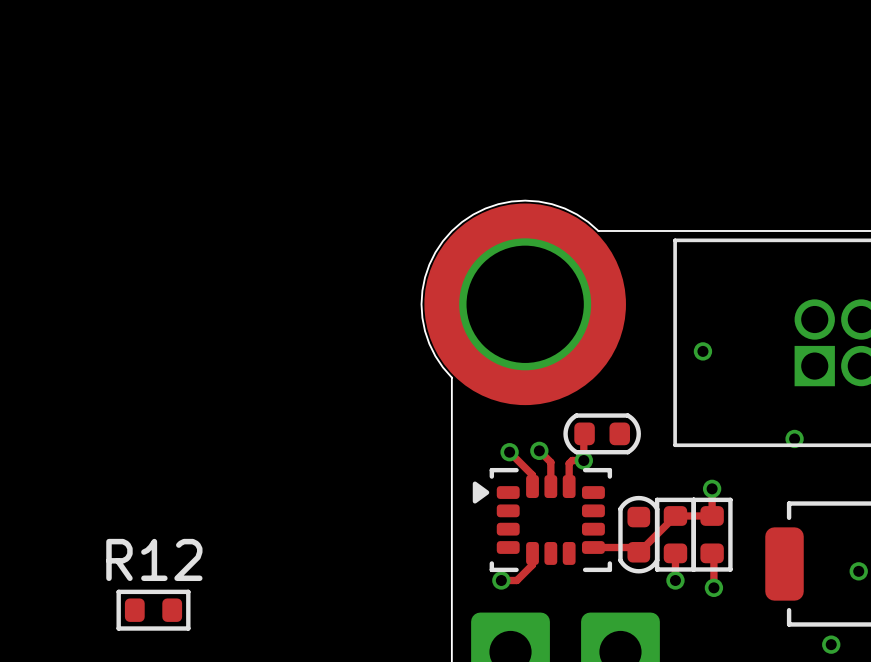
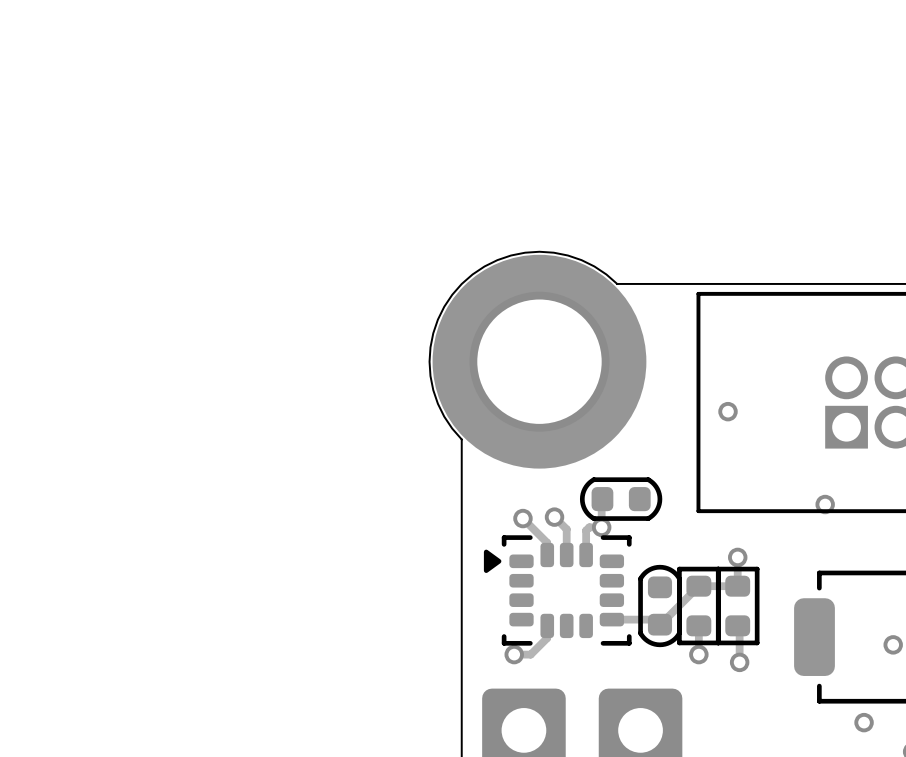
R12: (153, 610) -> none

